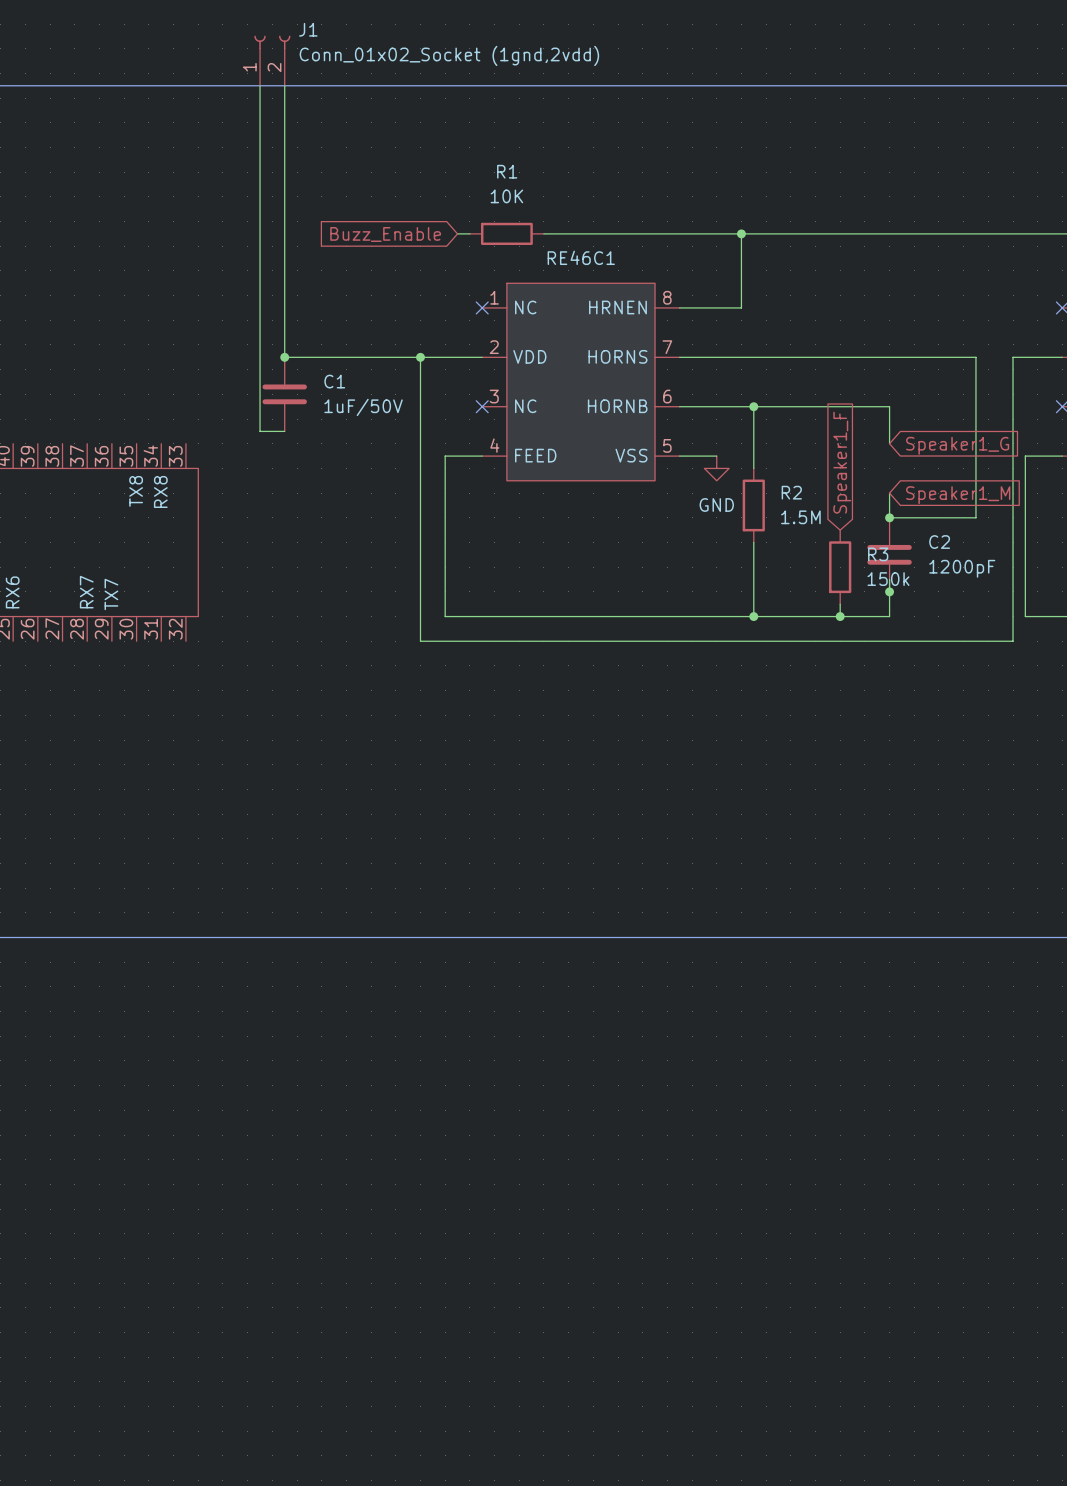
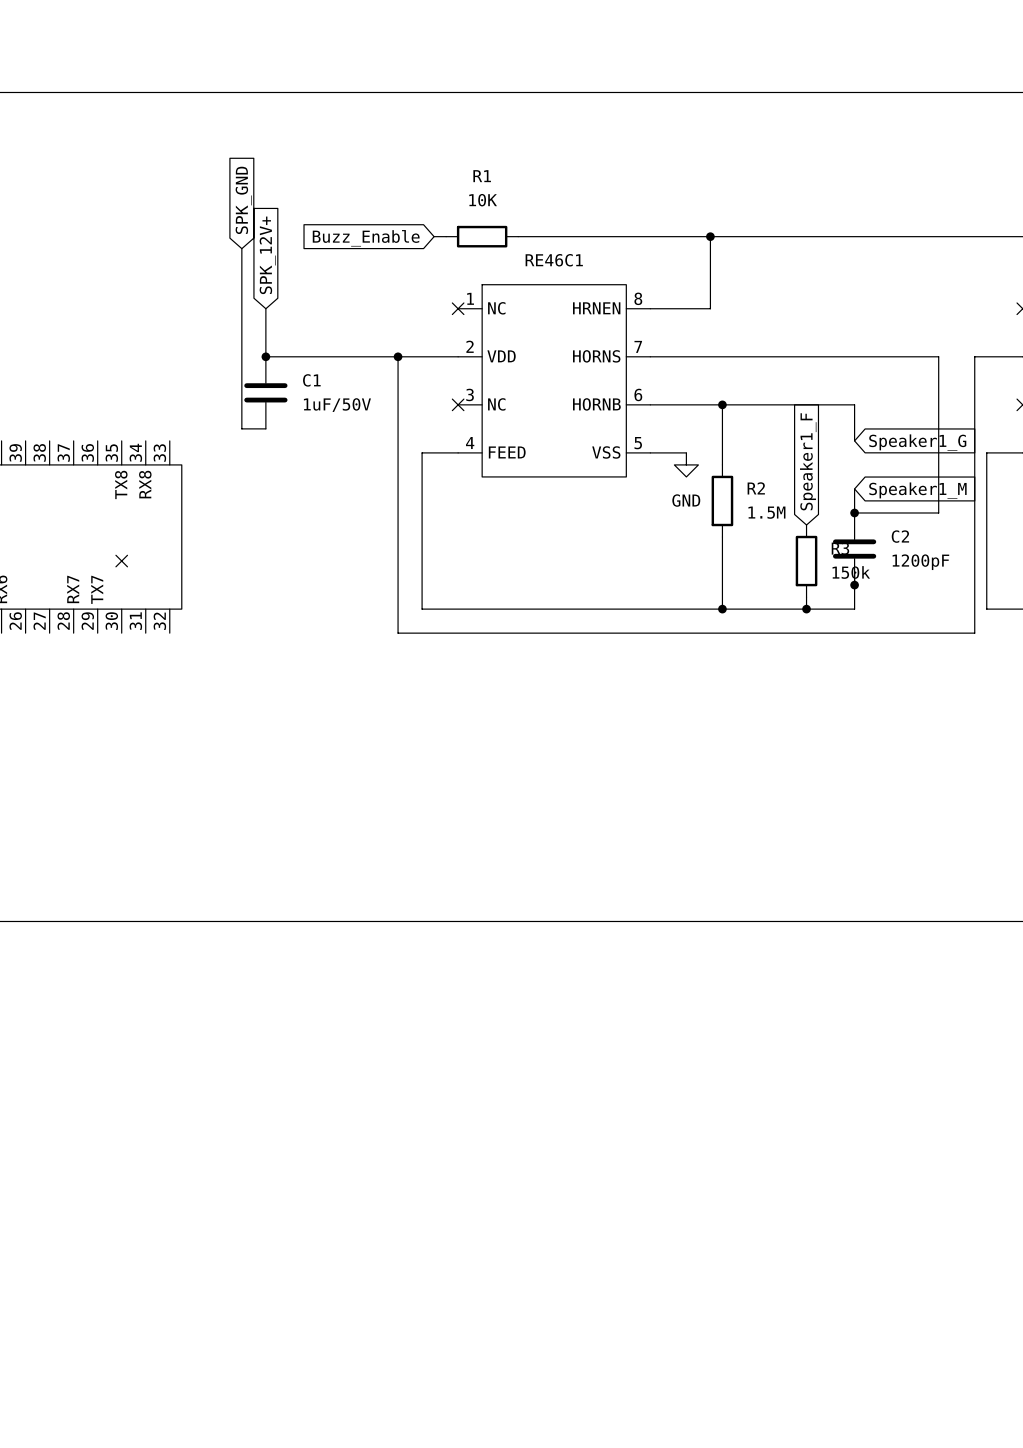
J1: Conn_01x02_Socket (1gnd,2vdd) (272, 60) -> none
wire: (260, 85) (260, 246) -> none
wire: (284, 85) (284, 307) -> none
global label: none -> SPK_GND (243, 200)
global label: none -> SPK_12V+ (267, 255)
no-connect mark: none -> (121, 561)

